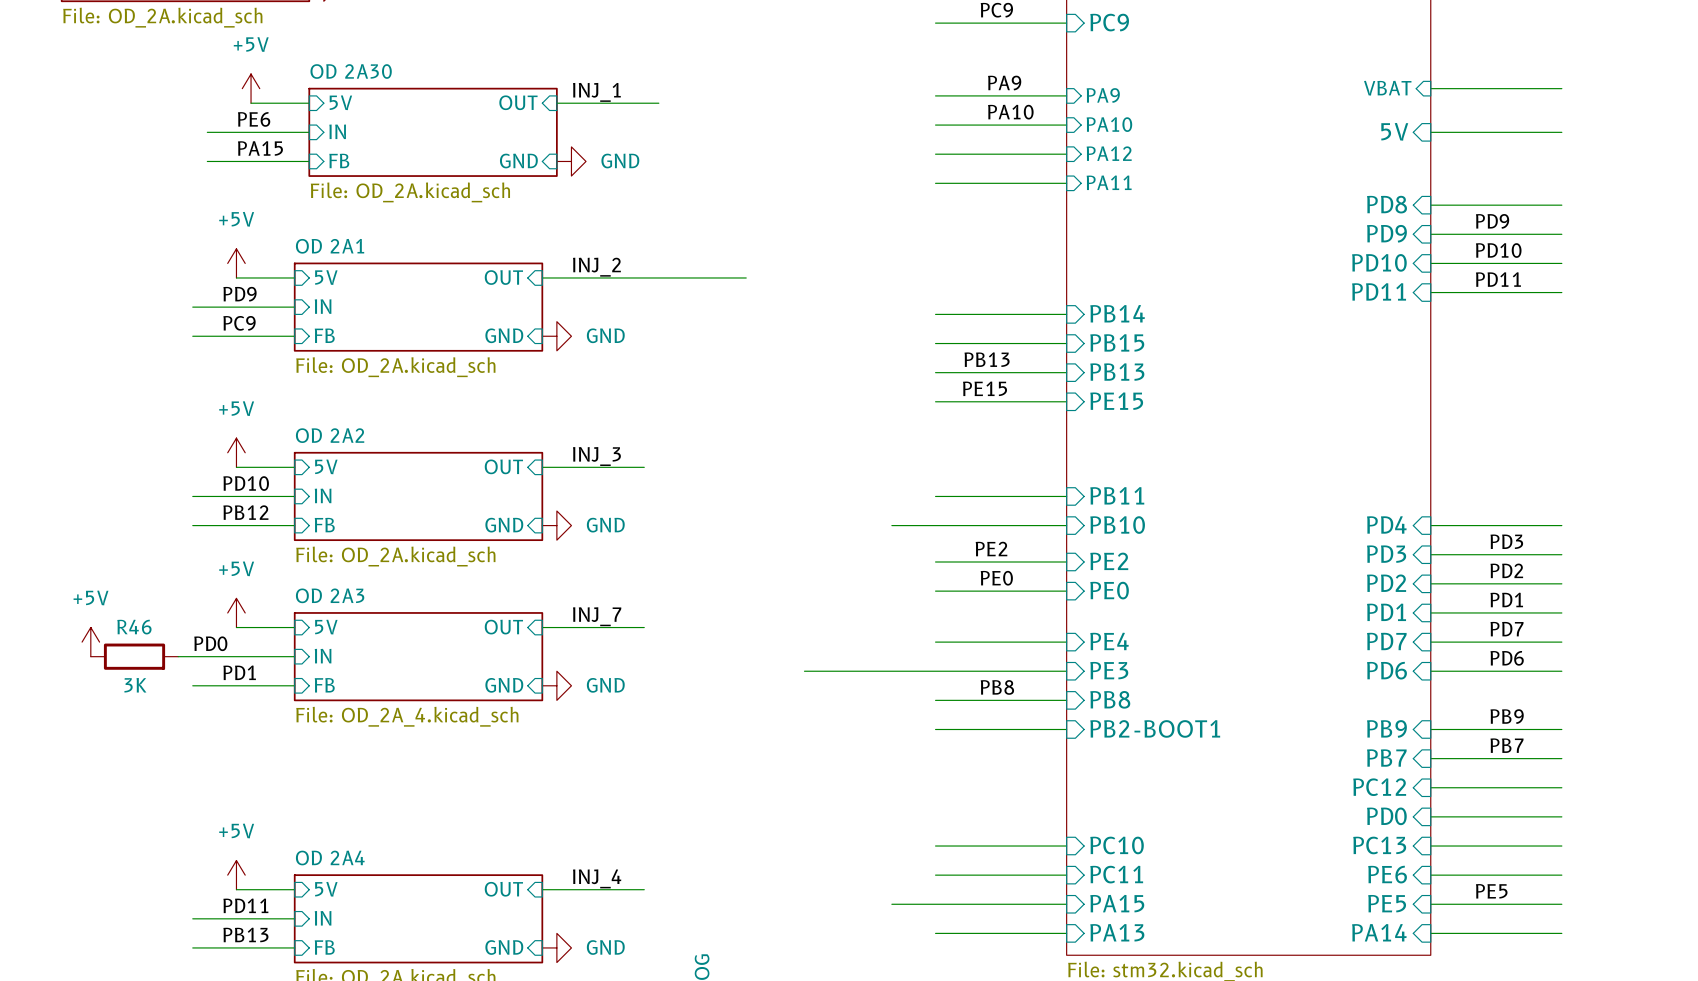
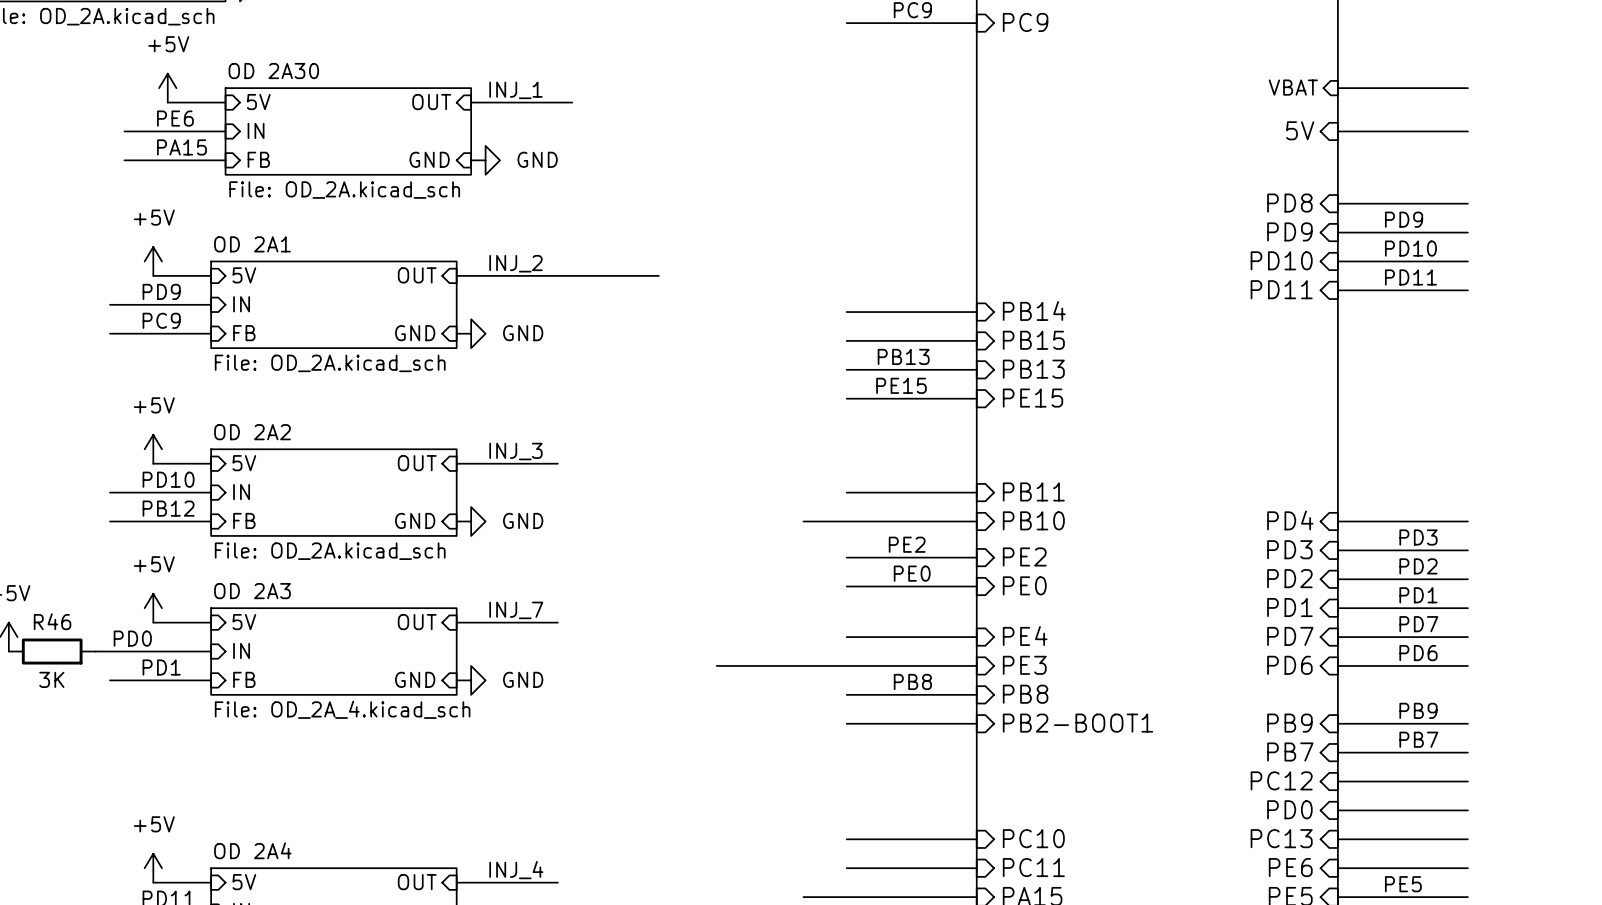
label: PA9 (1004, 83) -> none
wire: (935, 95) (1066, 95) -> none
sheet pin: PA9 (1103, 95) -> none
label: PA10 (1010, 112) -> none
sheet pin: PA10 (1109, 124) -> none
wire: (935, 125) (1066, 125) -> none
sheet pin: PA12 (1109, 153) -> none
wire: (935, 154) (1066, 154) -> none
sheet pin: PA11 (1109, 182) -> none
wire: (935, 183) (1066, 183) -> none

